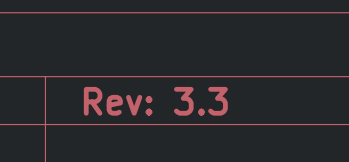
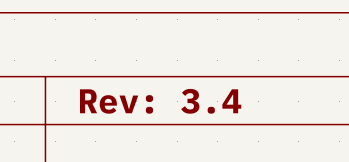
title block: Rev: 3.3 (155, 101) -> Rev: 3.4 (160, 101)

